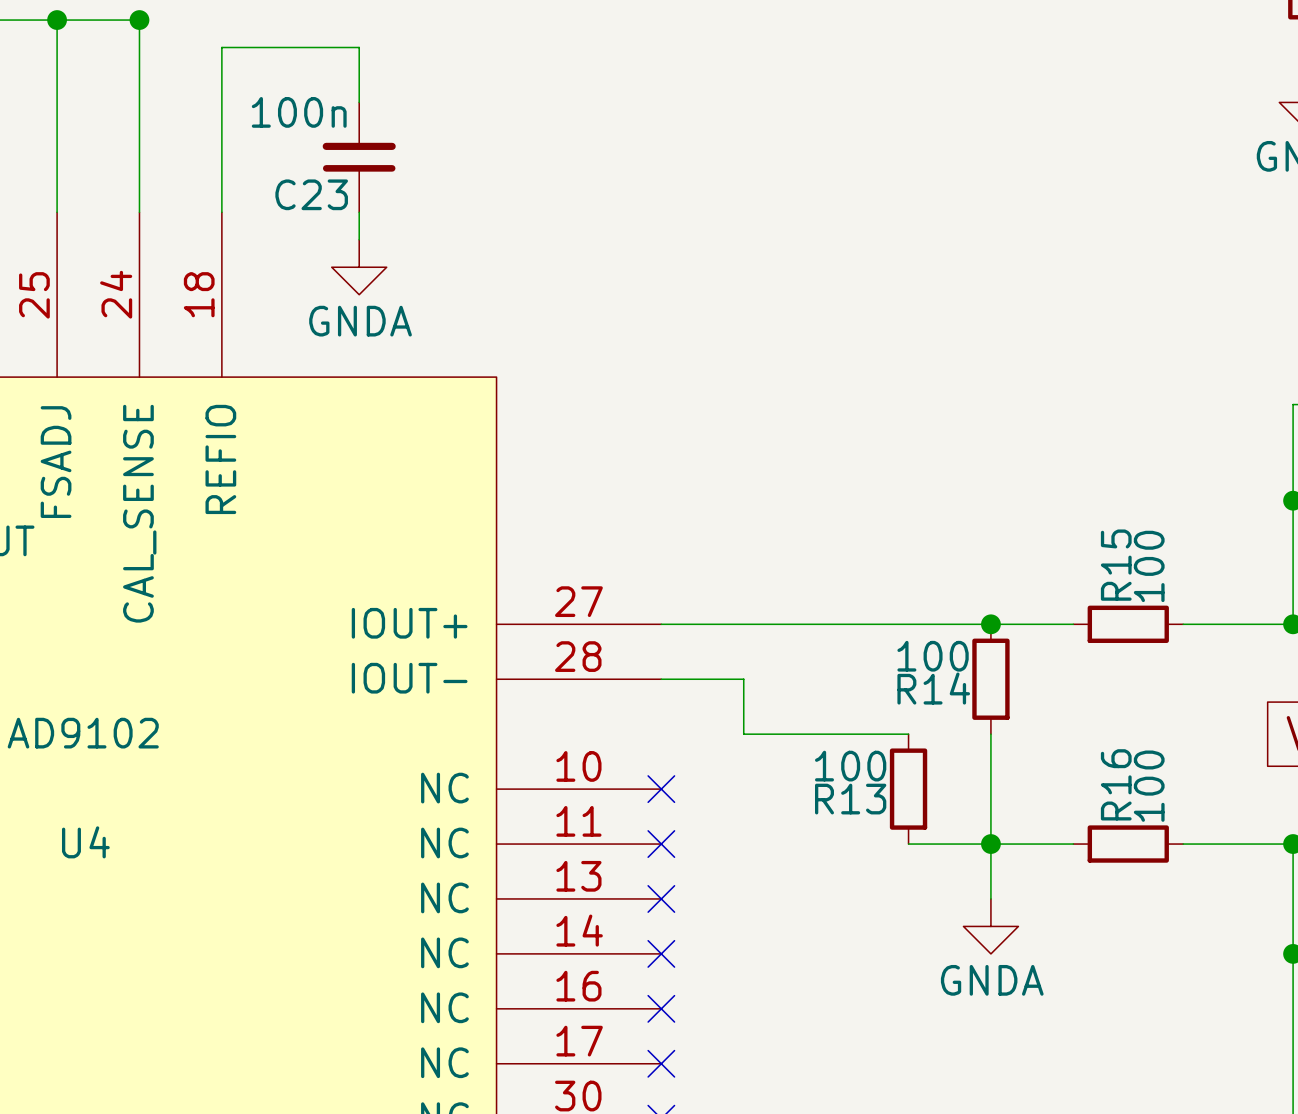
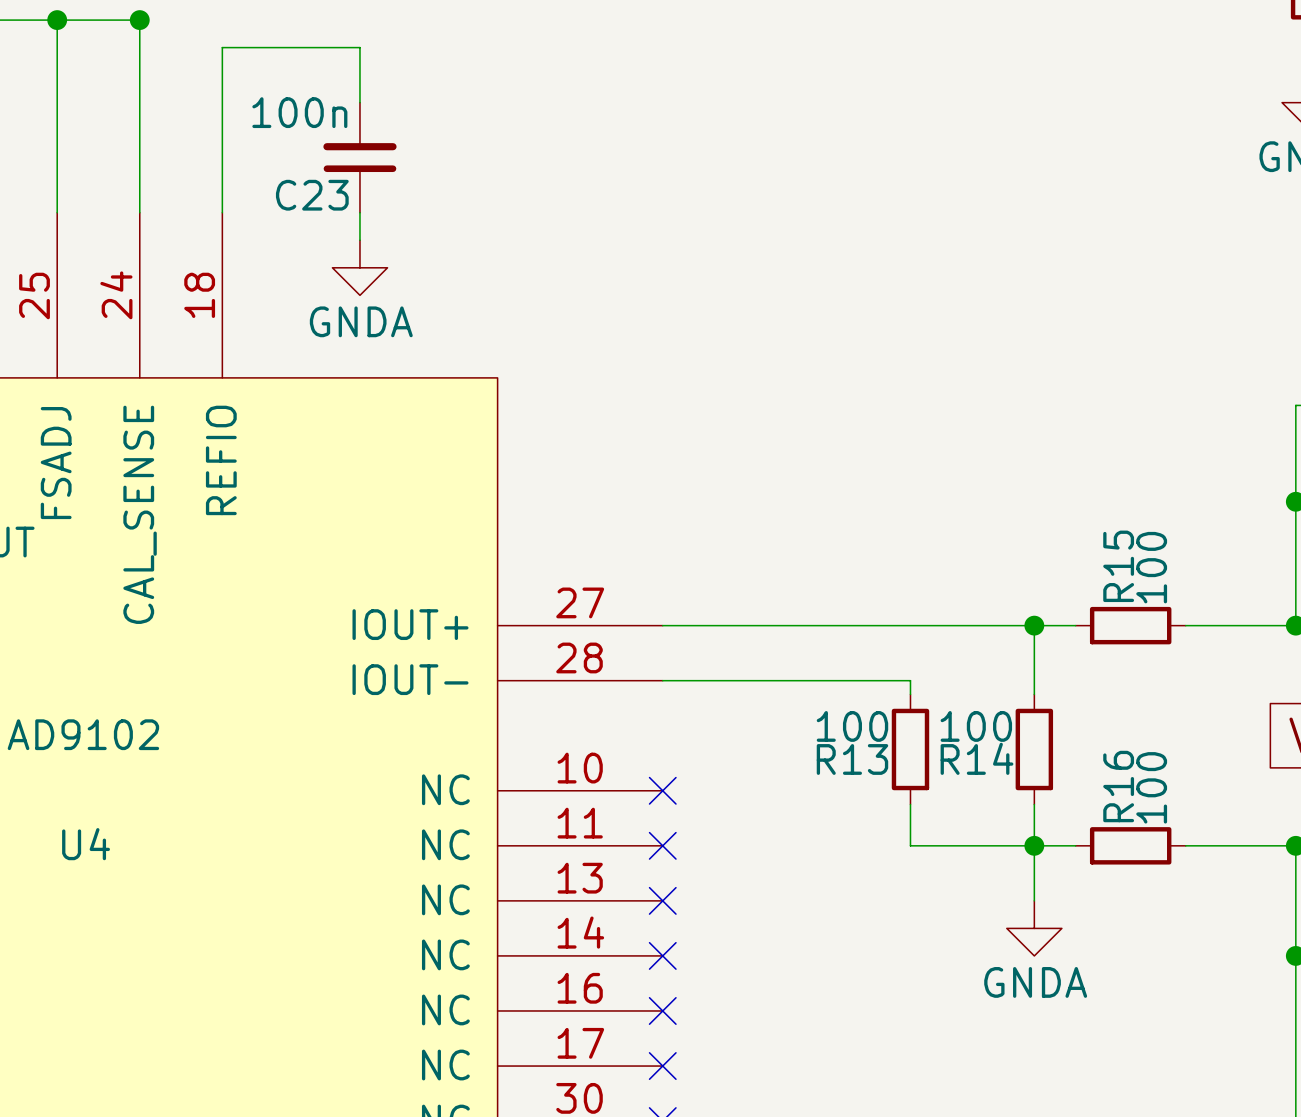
junction position: (990, 624) -> (1034, 625)
wire: none -> (1034, 625) (1034, 694)
wire: (743, 679) (743, 734) (908, 734) -> (745, 680) (910, 680) (910, 694)
R14 position: (990, 679) -> (1034, 749)
wire: (990, 734) (990, 898) -> none
R13 position: (908, 789) -> (910, 749)
wire: none -> (910, 804) (910, 845)
wire: none -> (1034, 804) (1034, 900)
junction position: (990, 844) -> (1034, 845)
power symbol position: GNDA (990, 926) -> GNDA (1034, 928)

